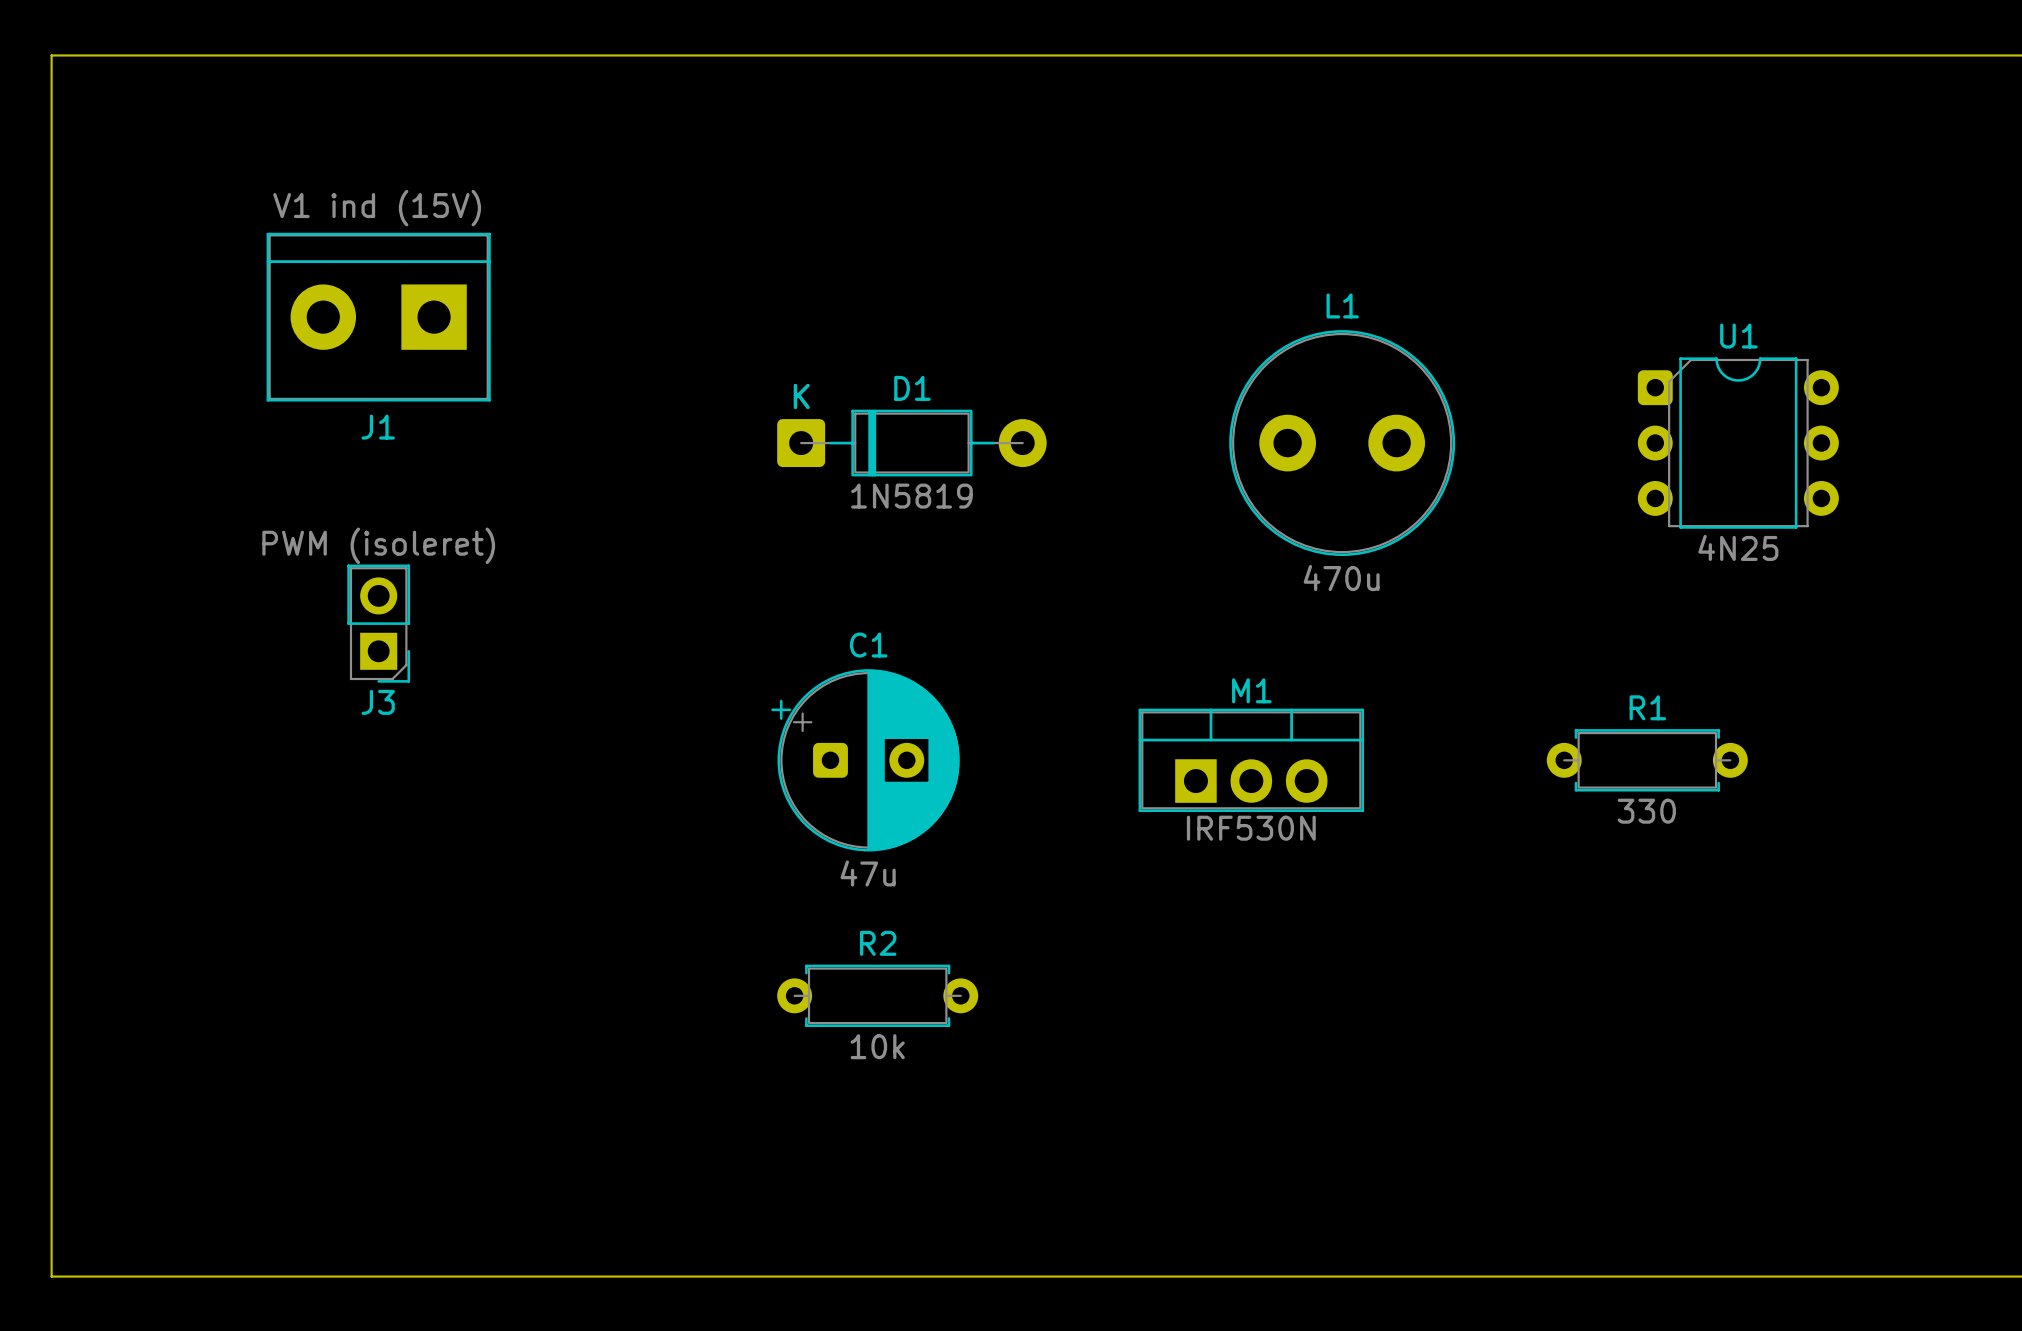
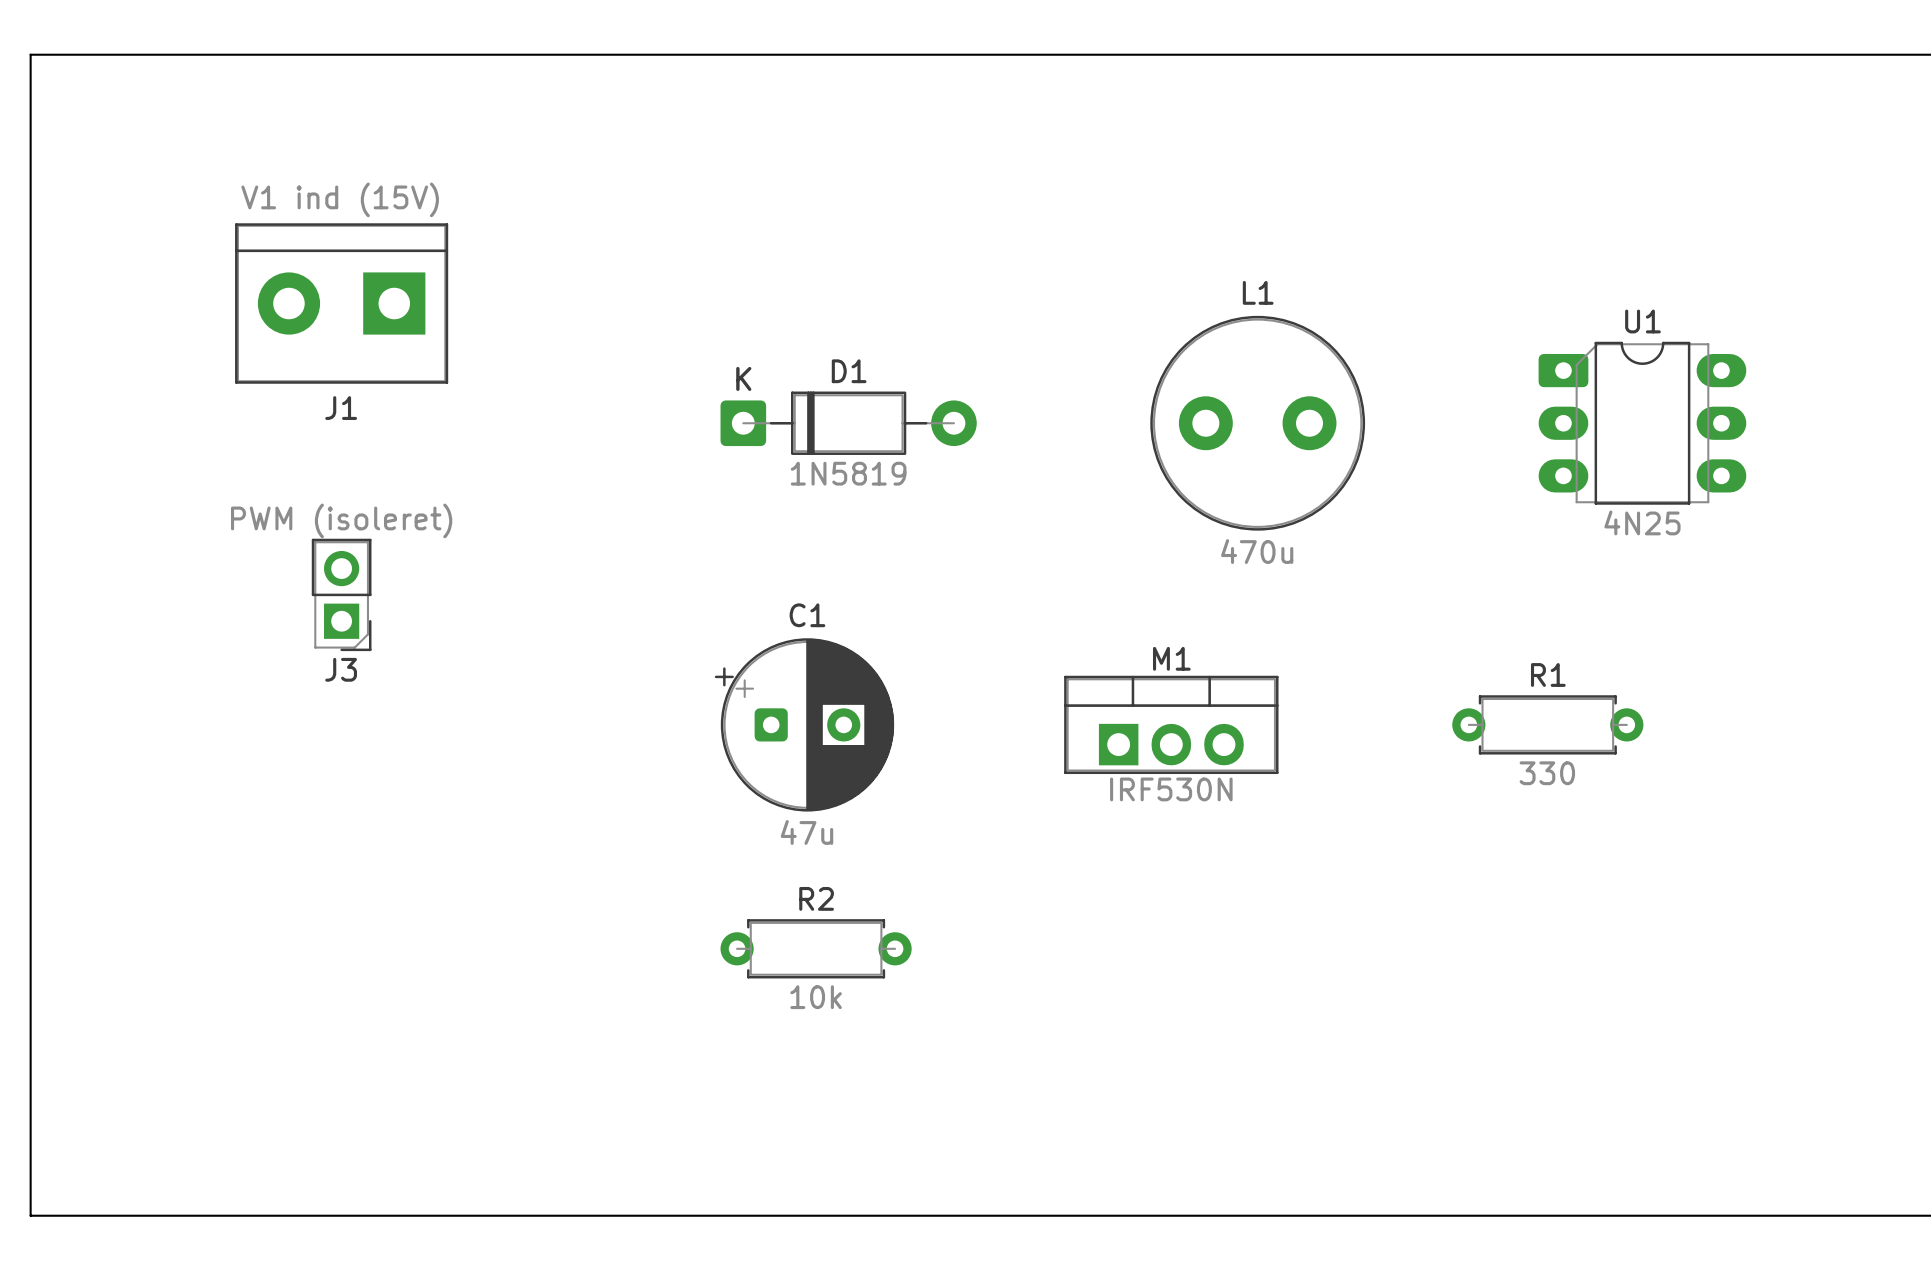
U1 footprint: [1637, 357, 1839, 529] -> [1538, 341, 1747, 505]

